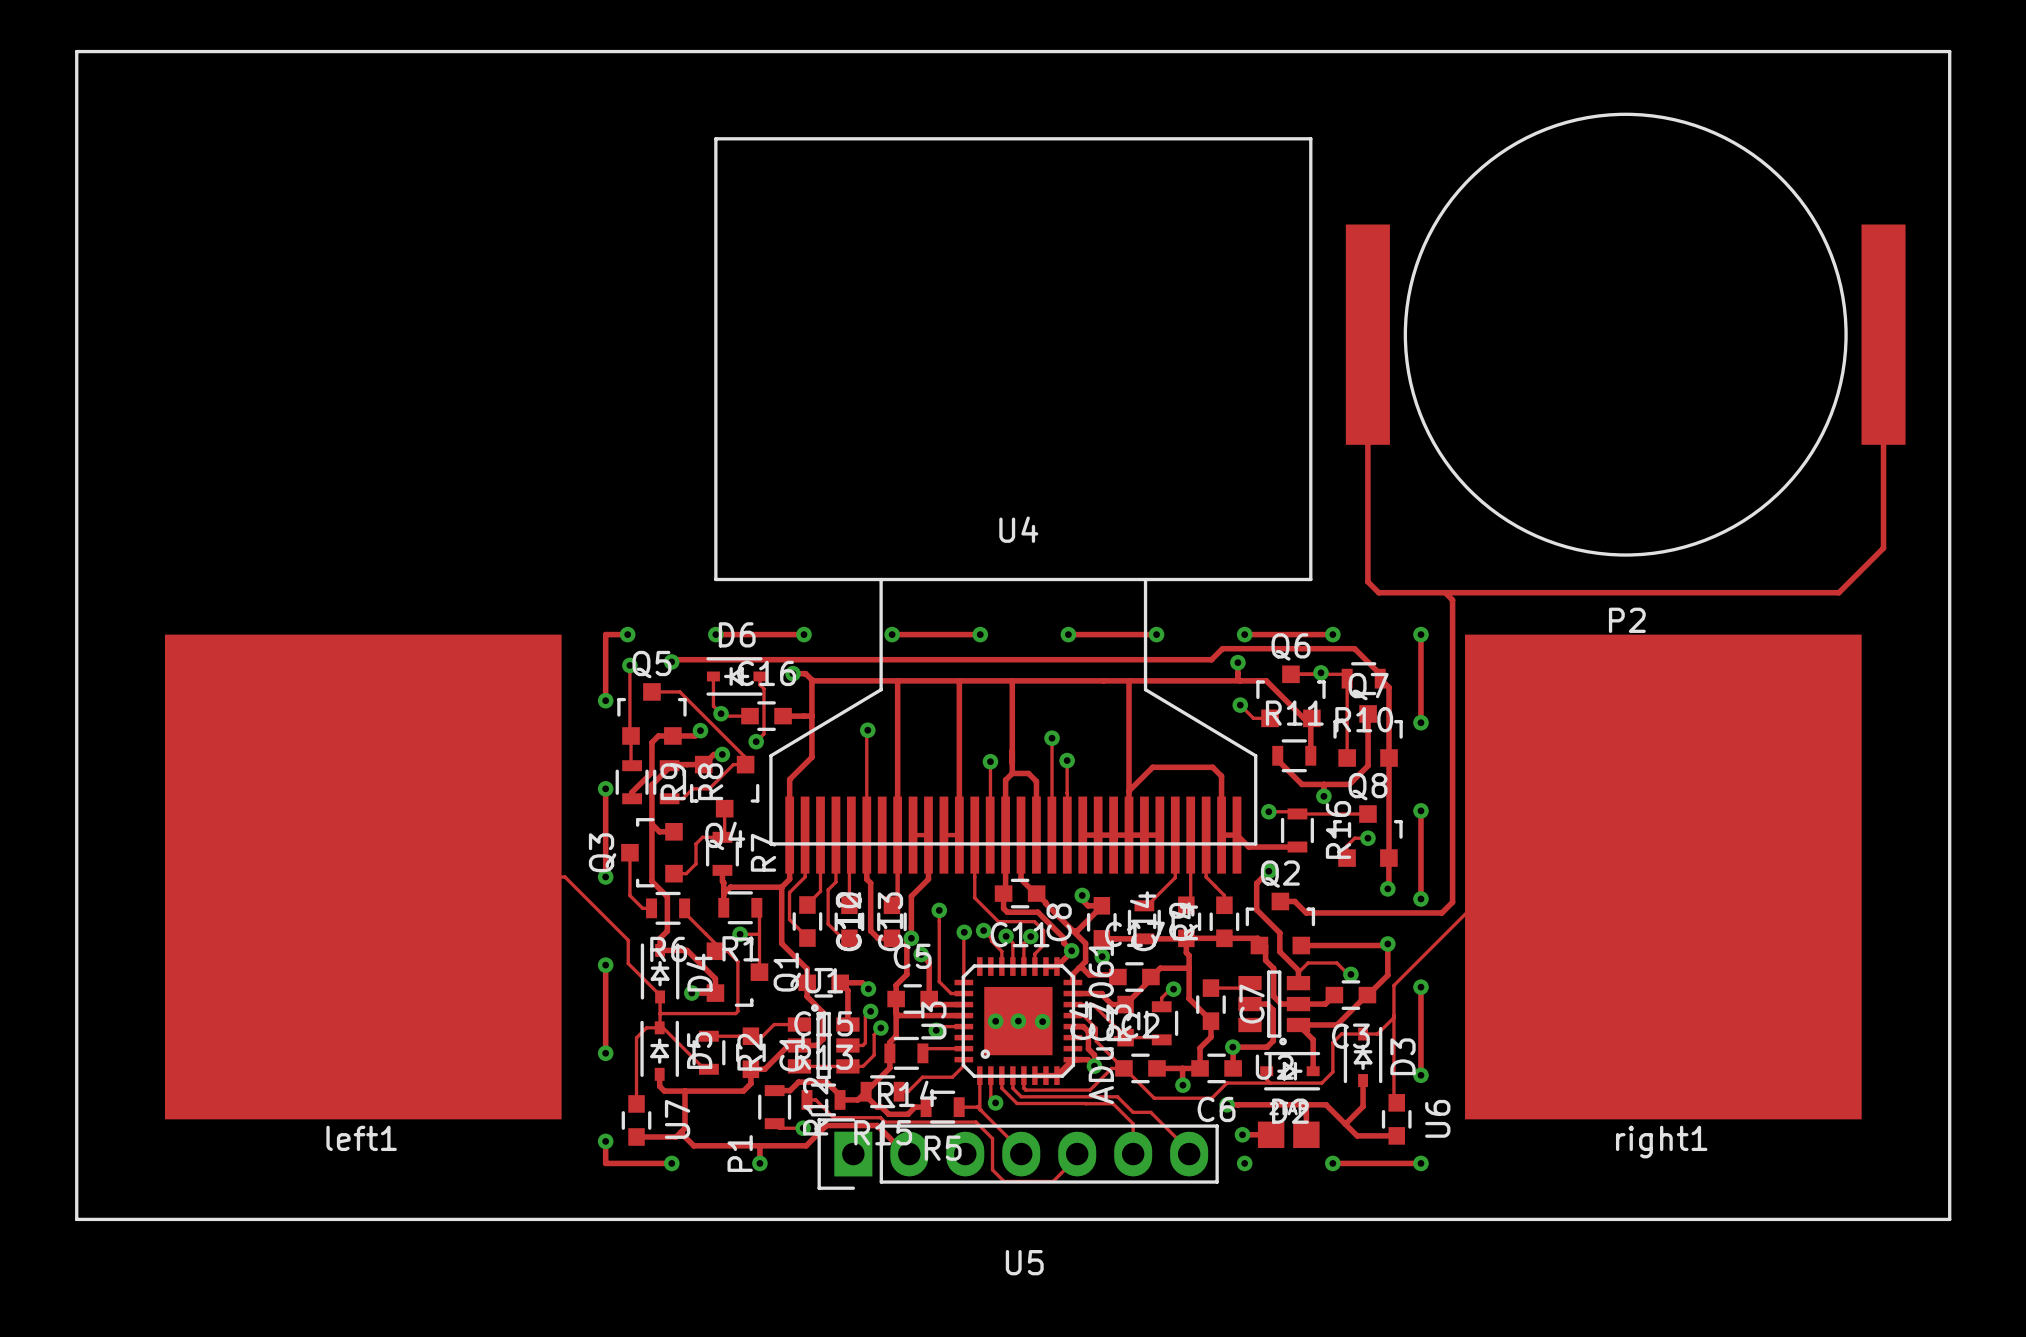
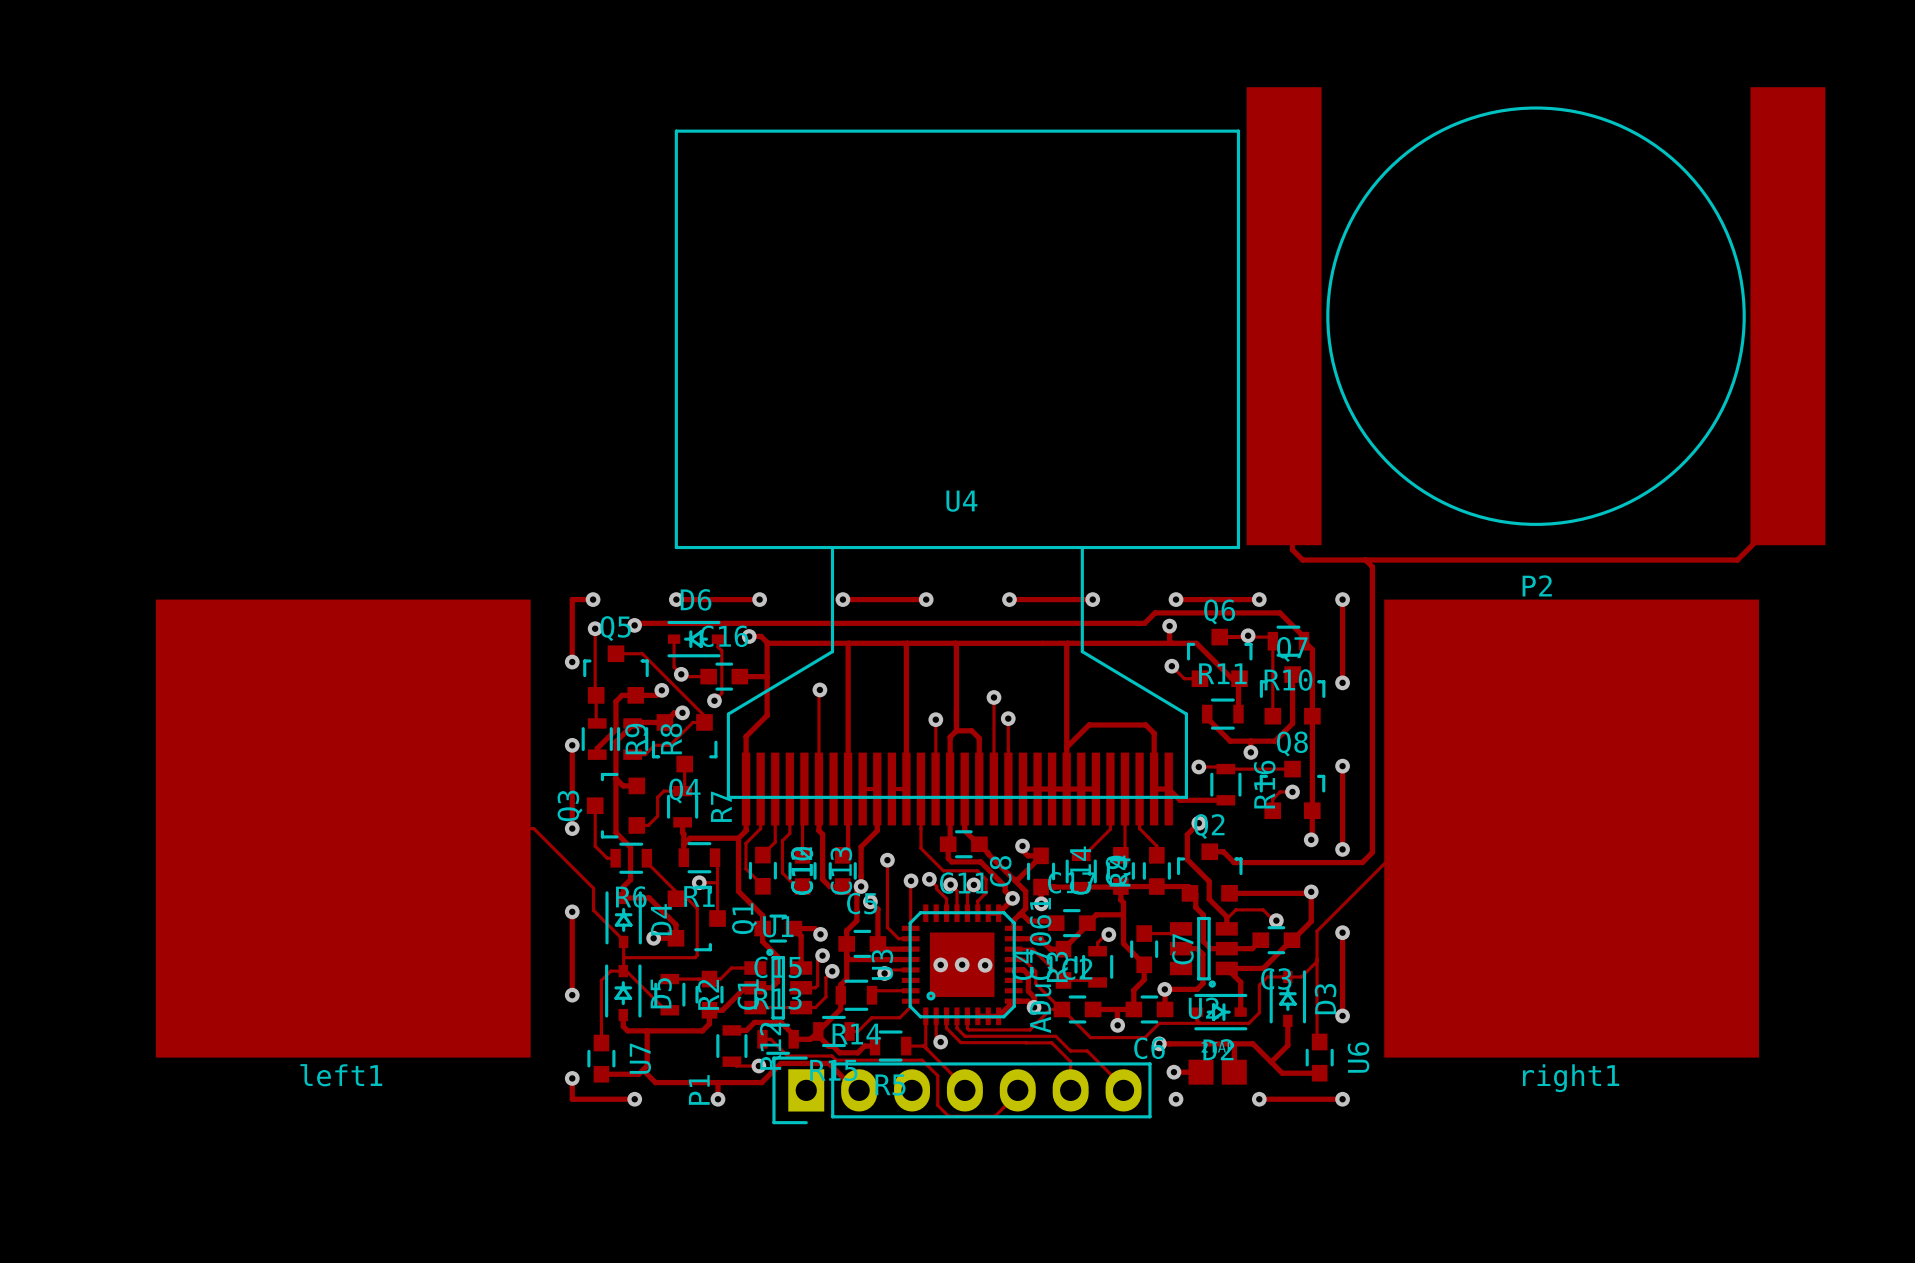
P2 footprint: [1345, 112, 1906, 557] -> [1246, 87, 1826, 546]
U5: (1013, 635) -> none

